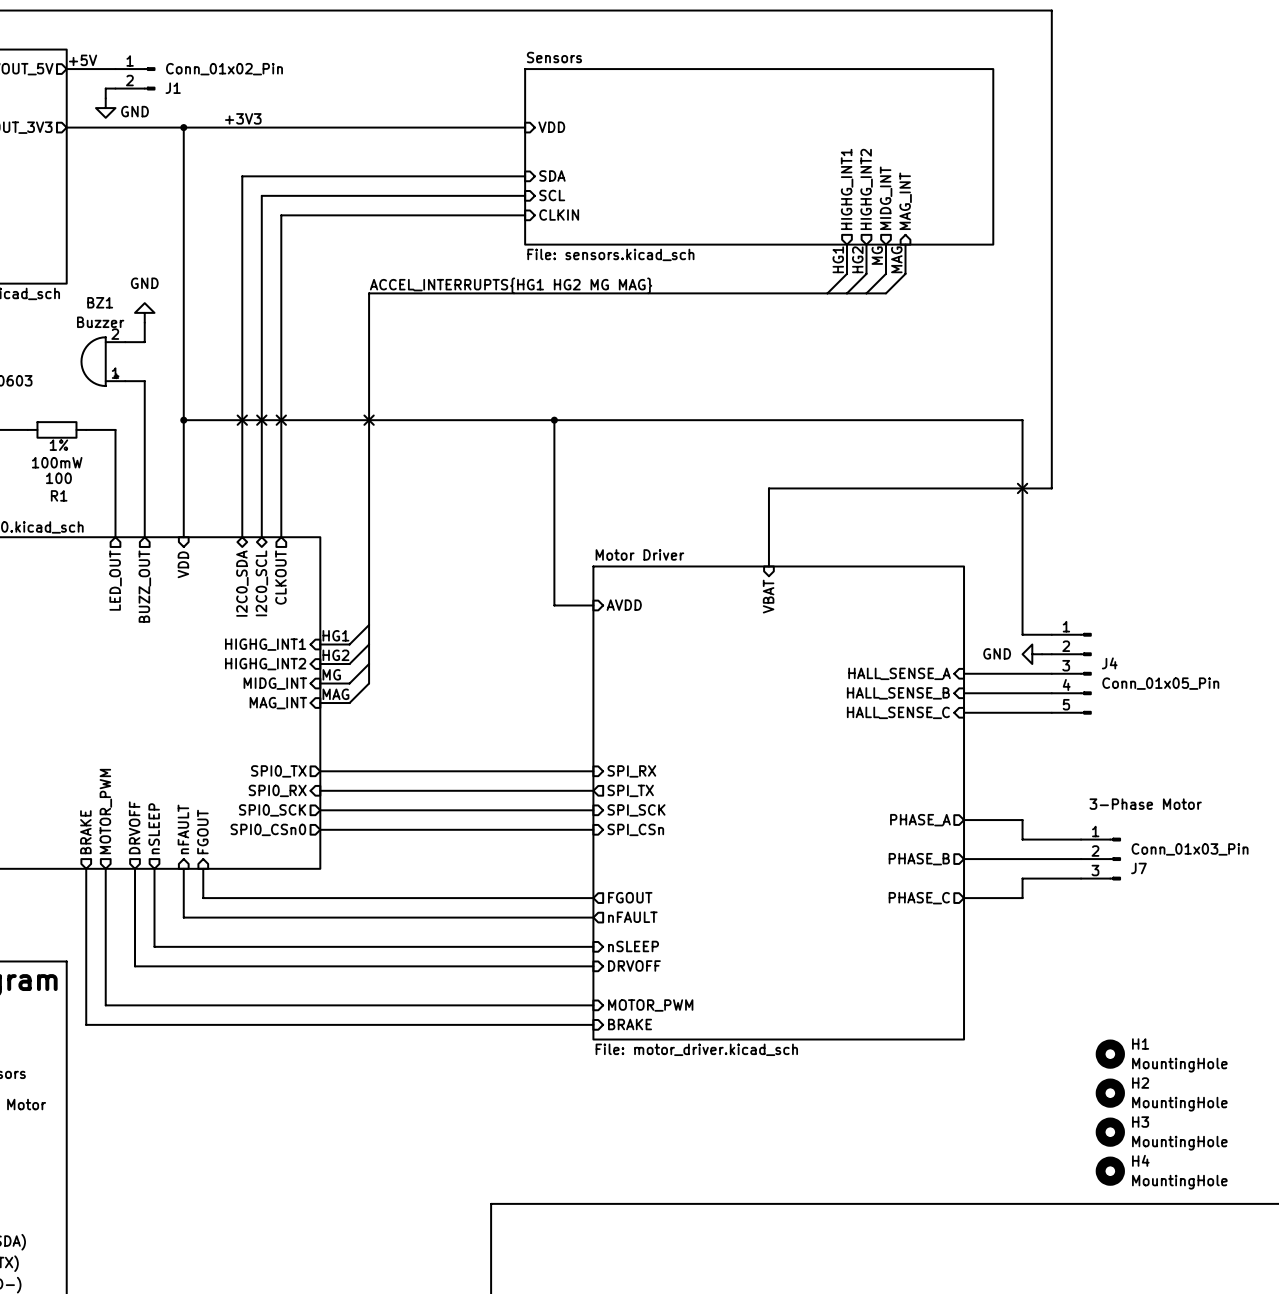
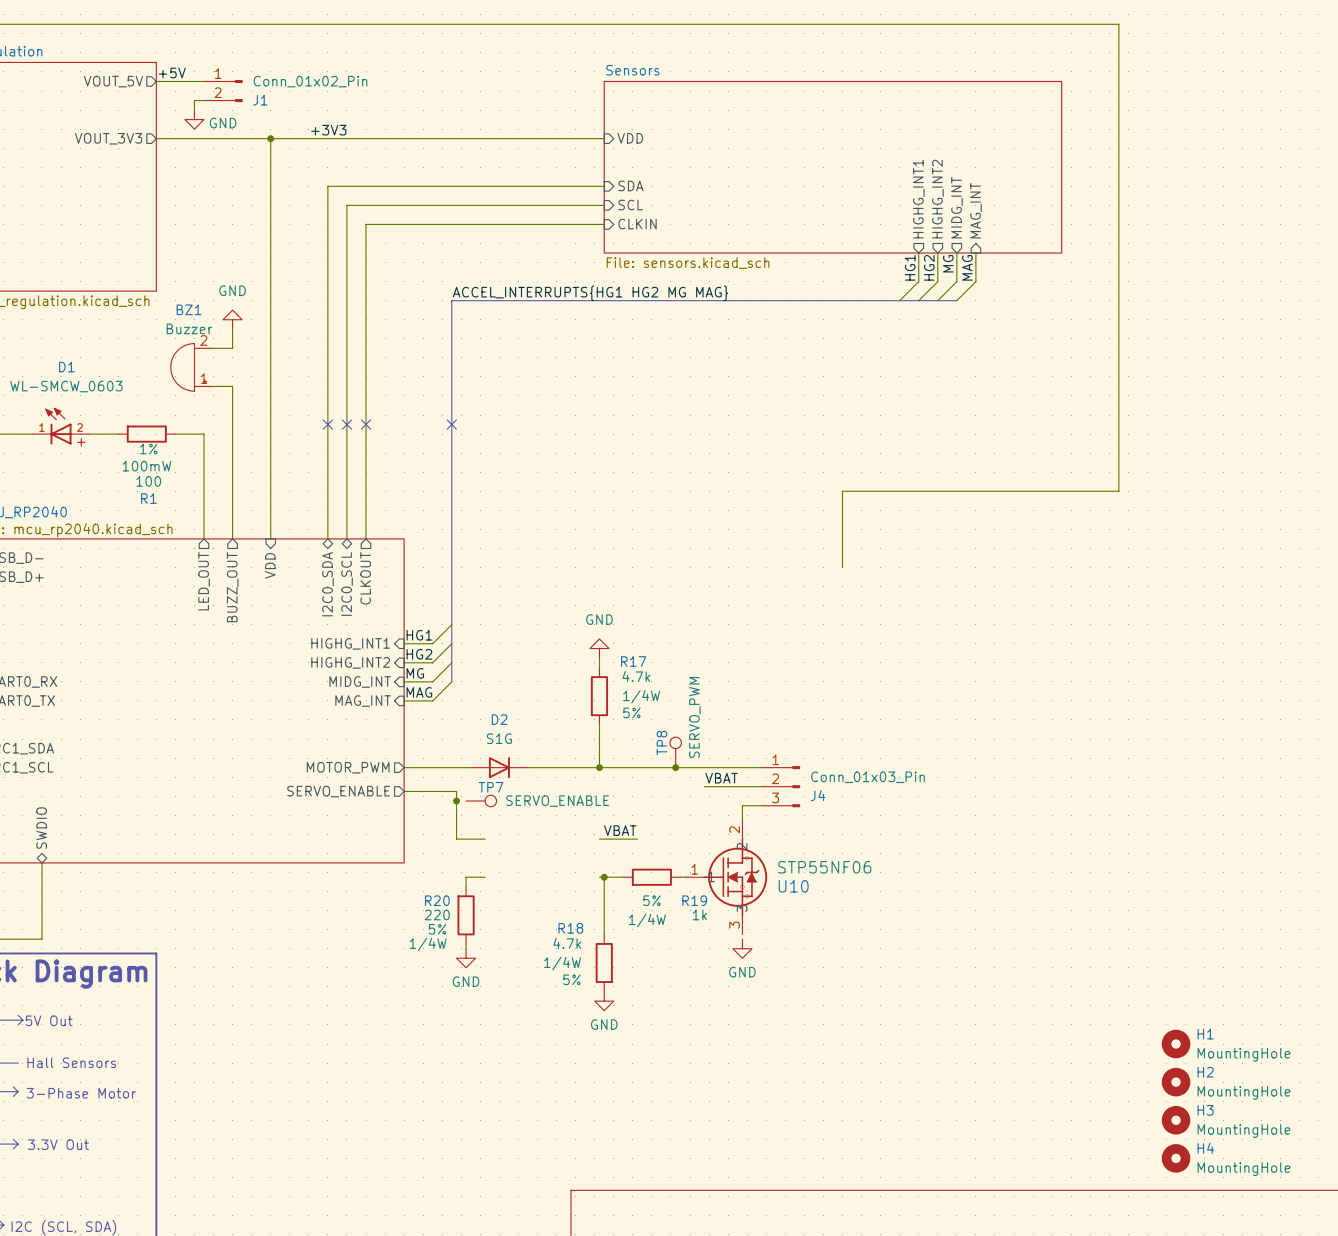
wire: (183, 420) (1022, 420) (1022, 634) (1051, 634) -> none
junction: (183, 420) -> none
wire: (554, 420) (554, 605) (593, 605) -> none
junction: (554, 420) -> none
no-connect mark: (1022, 488) -> none
sheet pin: VBAT (768, 596) -> none
sheet pin: AVDD (624, 605) -> none
J4 symbol: [1051, 633, 1092, 715] -> [761, 766, 801, 808]
power symbol: none -> GND (599, 648)
power symbol: GND (1032, 654) -> none
wire: (1042, 654) (1051, 654) -> none
wire: none -> (599, 658) (599, 667)
J4 name position: J4 (1109, 663) -> J4 (818, 795)
sheet pin: HALL_SENSE_A (899, 673) -> none
wire: (964, 673) (1051, 673) -> none
J4 value: Conn_01x05_Pin (1160, 683) -> Conn_01x03_Pin (867, 777)
sheet pin: HALL_SENSE_B (898, 693) -> none
wire: (964, 693) (1051, 693) -> none
R17: none -> 4.7k (599, 696)
sheet pin: HALL_SENSE_C (898, 712) -> none
wire: (964, 712) (1051, 712) -> none
wire: none -> (599, 724) (599, 767)
TP8: none -> SERVO_PWM (675, 752)
sheet pin: SPI0_TX (278, 771) -> MOTOR_PWM (348, 767)
D2: none -> S1G (499, 767)
junction: none -> (599, 767)
wire: none -> (670, 767) (761, 767)
junction: none -> (675, 767)
sheet pin: SPI_RX (631, 771) -> none
label: none -> VBAT (721, 778)
sheet pin shape: input (277, 790) -> output (338, 791)
sheet pin: SPI0_RX (277, 790) -> SERVO_ENABLE (338, 791)
wire: (320, 790) (593, 790) -> none
wire: none -> (704, 786) (761, 786)
sheet pin: SPI_TX (630, 790) -> none
wire: none -> (404, 791) (456, 791) (456, 839) (485, 839)
sheet Motor Driver: File: motor_driver.kicad_sch (778, 802) -> none
text: 3-Phase Motor (1145, 804) -> none
junction: none -> (456, 800)
TP7: none -> SERVO_ENABLE (481, 800)
sheet pin: SPI0_SCK (272, 810) -> none
wire: (320, 810) (593, 810) -> none
sheet pin: SPI_SCK (636, 810) -> none
wire: none -> (761, 805) (742, 805) (742, 820)
sheet pin: MOTOR_PWM (105, 811) -> none
sheet pin: PHASE_A (920, 820) -> none
wire: (964, 820) (1022, 820) (1022, 839) (1081, 839) -> none
sheet pin: DRVOFF (134, 827) -> none
sheet pin: nSLEEP (154, 828) -> none
sheet pin: nFAULT (183, 829) -> none
sheet pin: SPI0_CSn0 (268, 829) -> none
wire: (320, 829) (593, 829) -> none
sheet pin: SPI_CSn (635, 829) -> none
sheet pin: FGOUT (202, 831) -> none
sheet pin: BRAKE (85, 832) -> none
label: none -> VBAT (620, 830)
wire: none -> (599, 839) (637, 839)
sheet pin: PHASE_B (919, 859) -> none
wire: (964, 859) (1081, 859) -> none
J7: Conn_01x03_Pin (1100, 859) -> none
wire: (86, 868) (86, 1024) (593, 1024) -> none
wire: (105, 868) (105, 1005) (593, 1005) -> none
wire: (135, 868) (135, 966) (593, 966) -> none
wire: (154, 868) (154, 946) (593, 946) -> none
wire: (183, 868) (183, 917) (593, 917) -> none
wire: (203, 868) (203, 898) (593, 898) -> none
wire: (1081, 878) (1022, 878) (1022, 898) (964, 898) -> none
wire: none -> (485, 877) (466, 877) (466, 886)
wire: none -> (599, 877) (623, 877)
wire: none -> (604, 877) (604, 934)
junction: none -> (604, 877)
R19: none -> 1k (651, 877)
wire: none -> (680, 877) (685, 877)
U10: none -> STP55NF06 (726, 877)
sheet pin: FGOUT (630, 897) -> none
sheet pin: PHASE_C (919, 898) -> none
sheet pin: nFAULT (632, 917) -> none
R20: none -> 220 (466, 915)
sheet pin: nSLEEP (633, 946) -> none
wire: none -> (466, 943) (466, 948)
power symbol: none -> GND (742, 948)
sheet pin: DRVOFF (634, 965) -> none
power symbol: none -> GND (466, 958)
R18: none -> 4.7k (604, 963)
sheet pin: MOTOR_PWM (650, 1005) -> none
power symbol: none -> GND (604, 1001)
sheet pin: BRAKE (630, 1024) -> none

